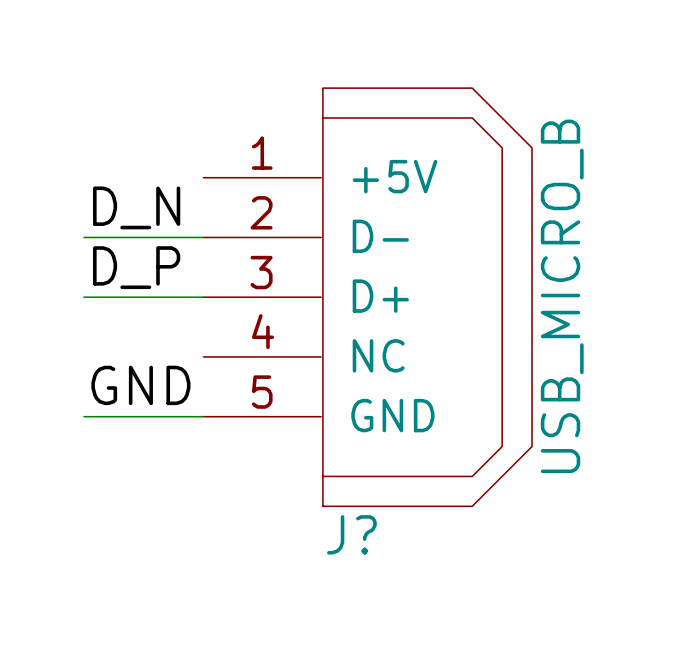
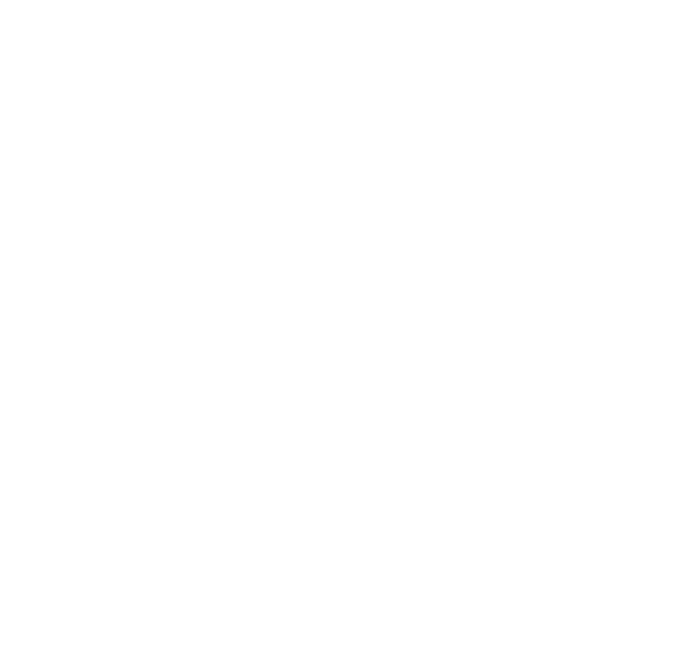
label: D_N (136, 207) -> none
wire: (83, 237) (203, 237) -> none
label: D_P (136, 267) -> none
wire: (83, 297) (203, 297) -> none
J?: USB_MICRO_B (367, 297) -> none
label: GND (140, 385) -> none
wire: (83, 416) (203, 416) -> none

